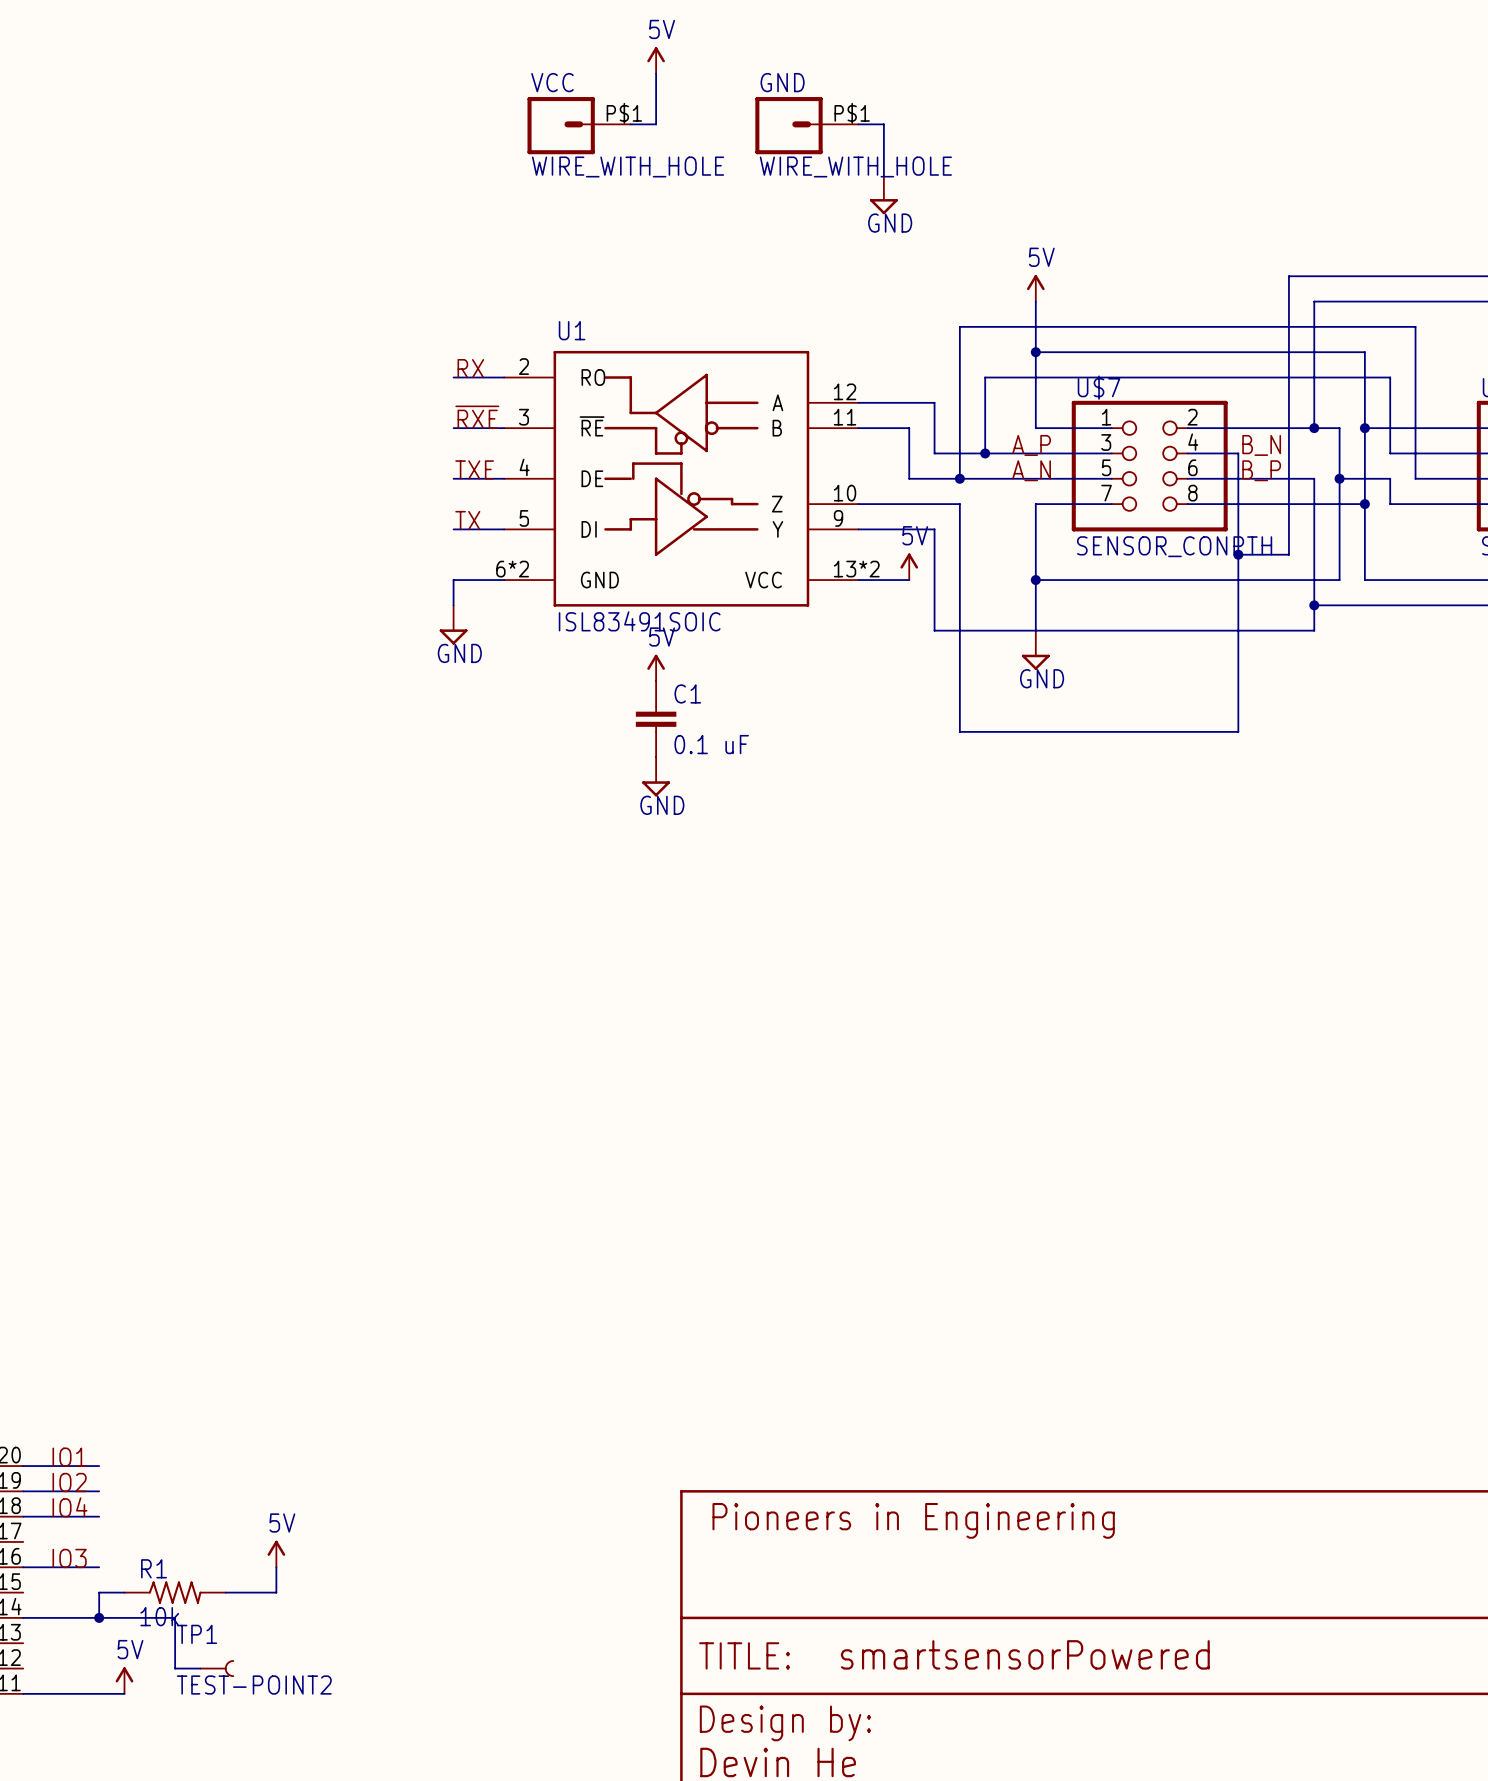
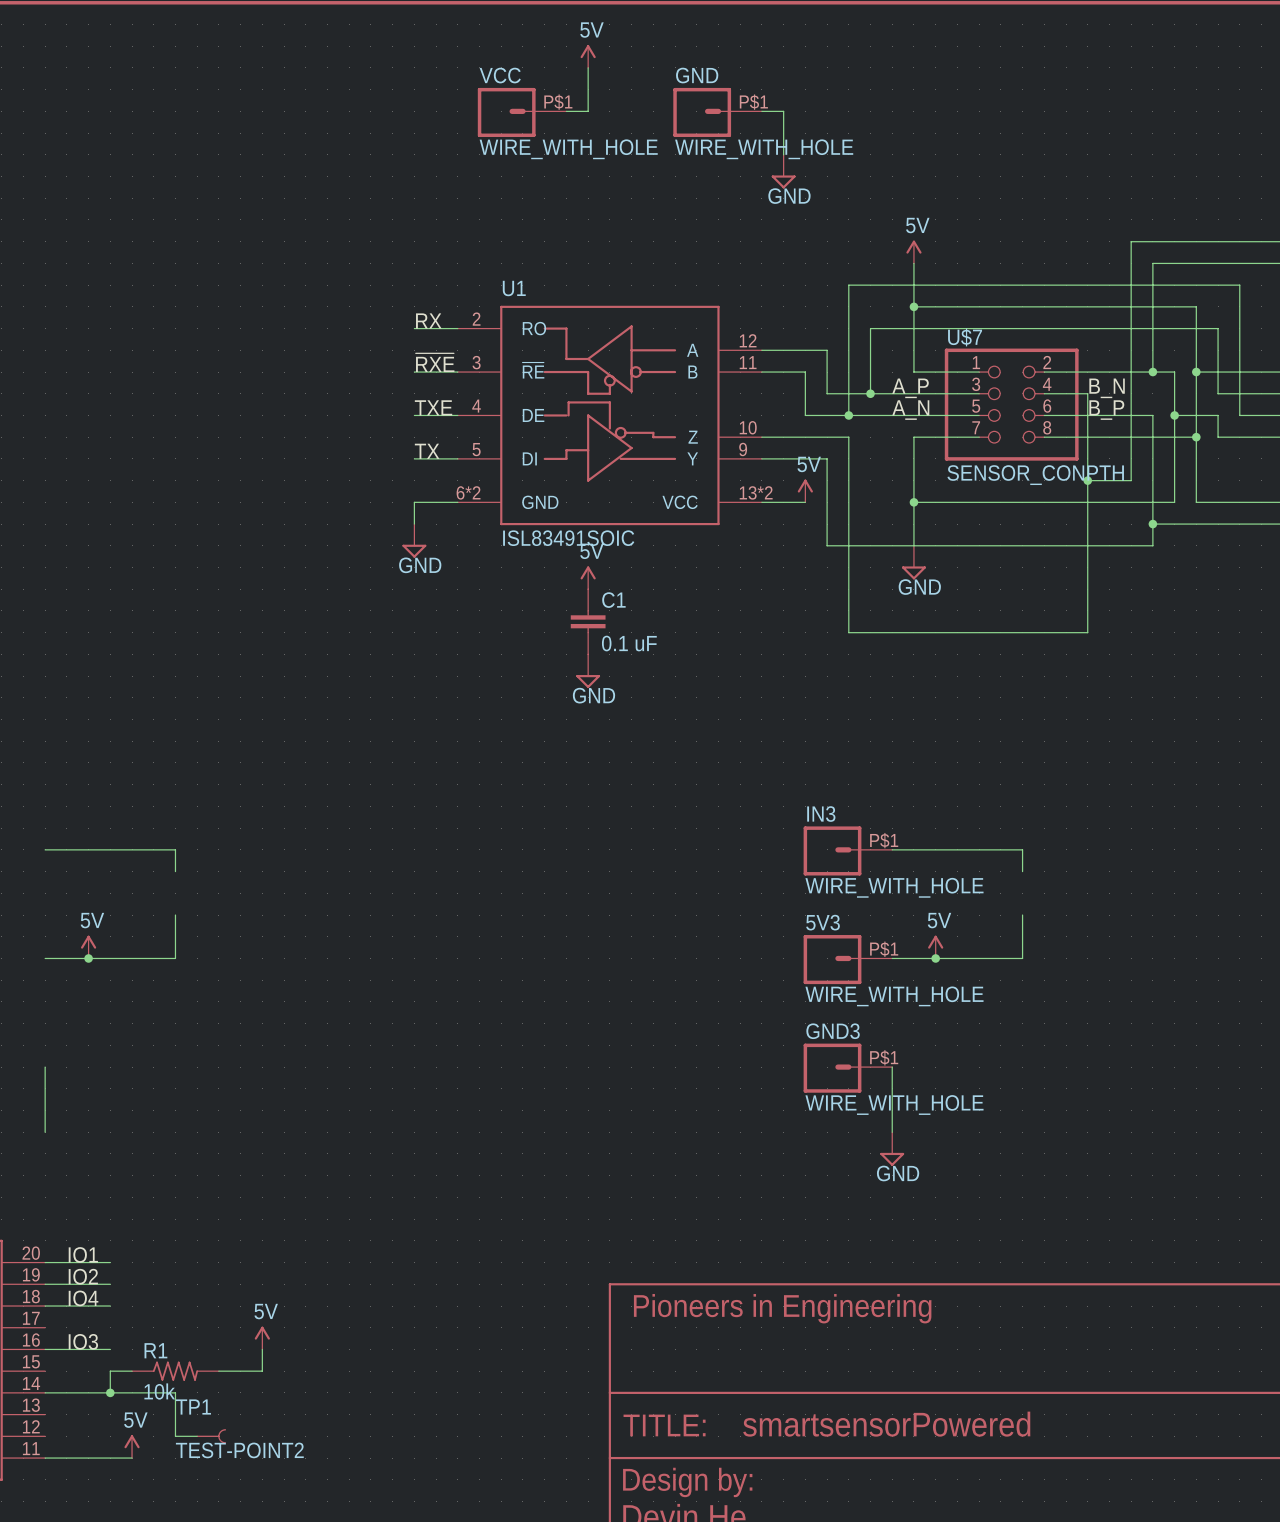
wire: none -> (45, 849) (175, 849) (175, 871)
wire: none -> (892, 849) (1022, 849) (1022, 871)
IN3: none -> WIRE_WITH_HOLE (847, 850)
wire: none -> (175, 915) (175, 958) (45, 958)
wire: none -> (1022, 915) (1022, 958) (892, 958)
power symbol: none -> 5V (88, 947)
power symbol: none -> 5V (935, 947)
junction: none -> (88, 958)
junction: none -> (935, 958)
5V3: none -> WIRE_WITH_HOLE (847, 959)
wire: none -> (45, 1067) (45, 1132)
wire: none -> (892, 1067) (892, 1132)
GND3: none -> WIRE_WITH_HOLE (847, 1068)
power symbol: none -> GND (892, 1149)

